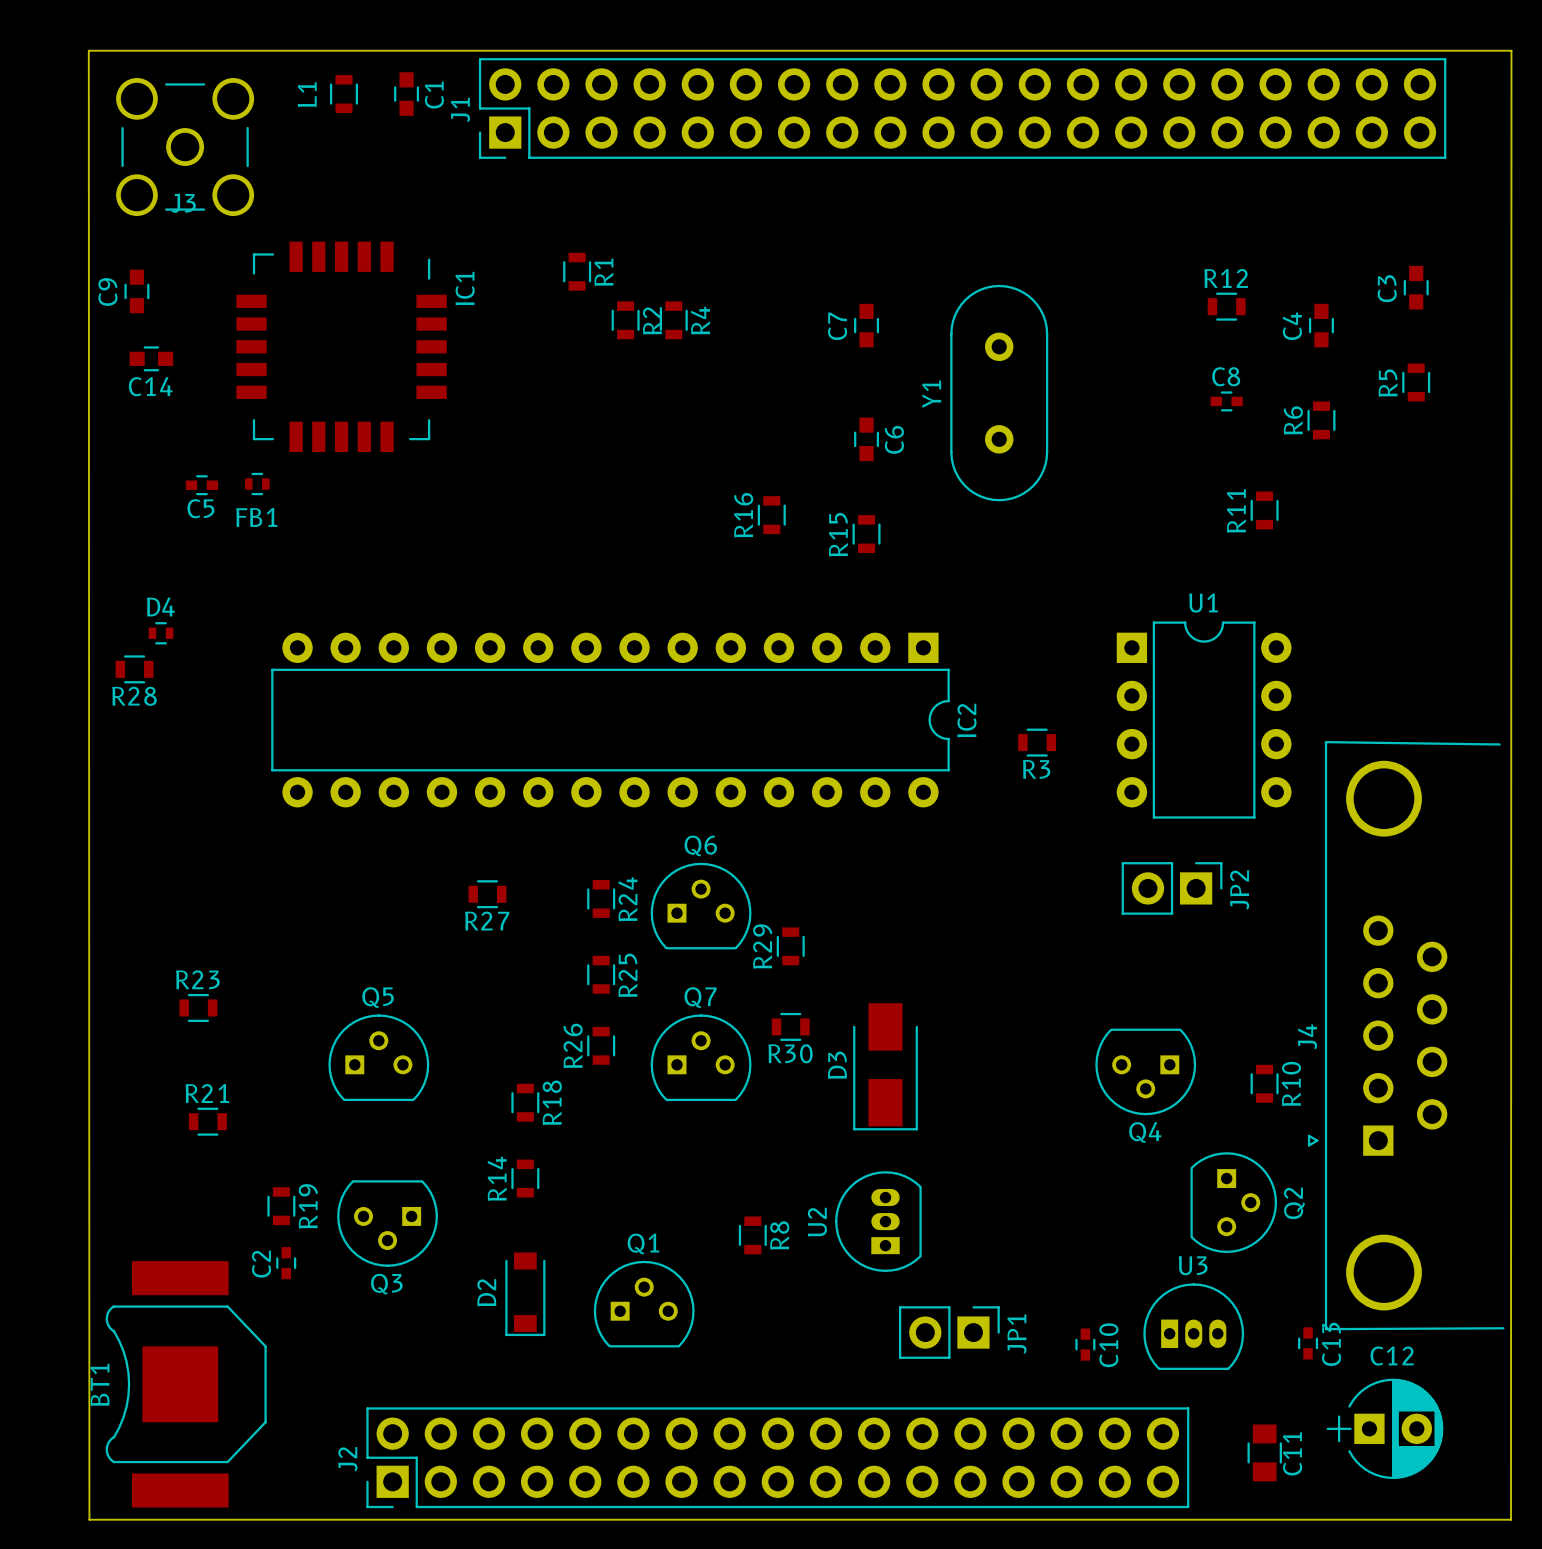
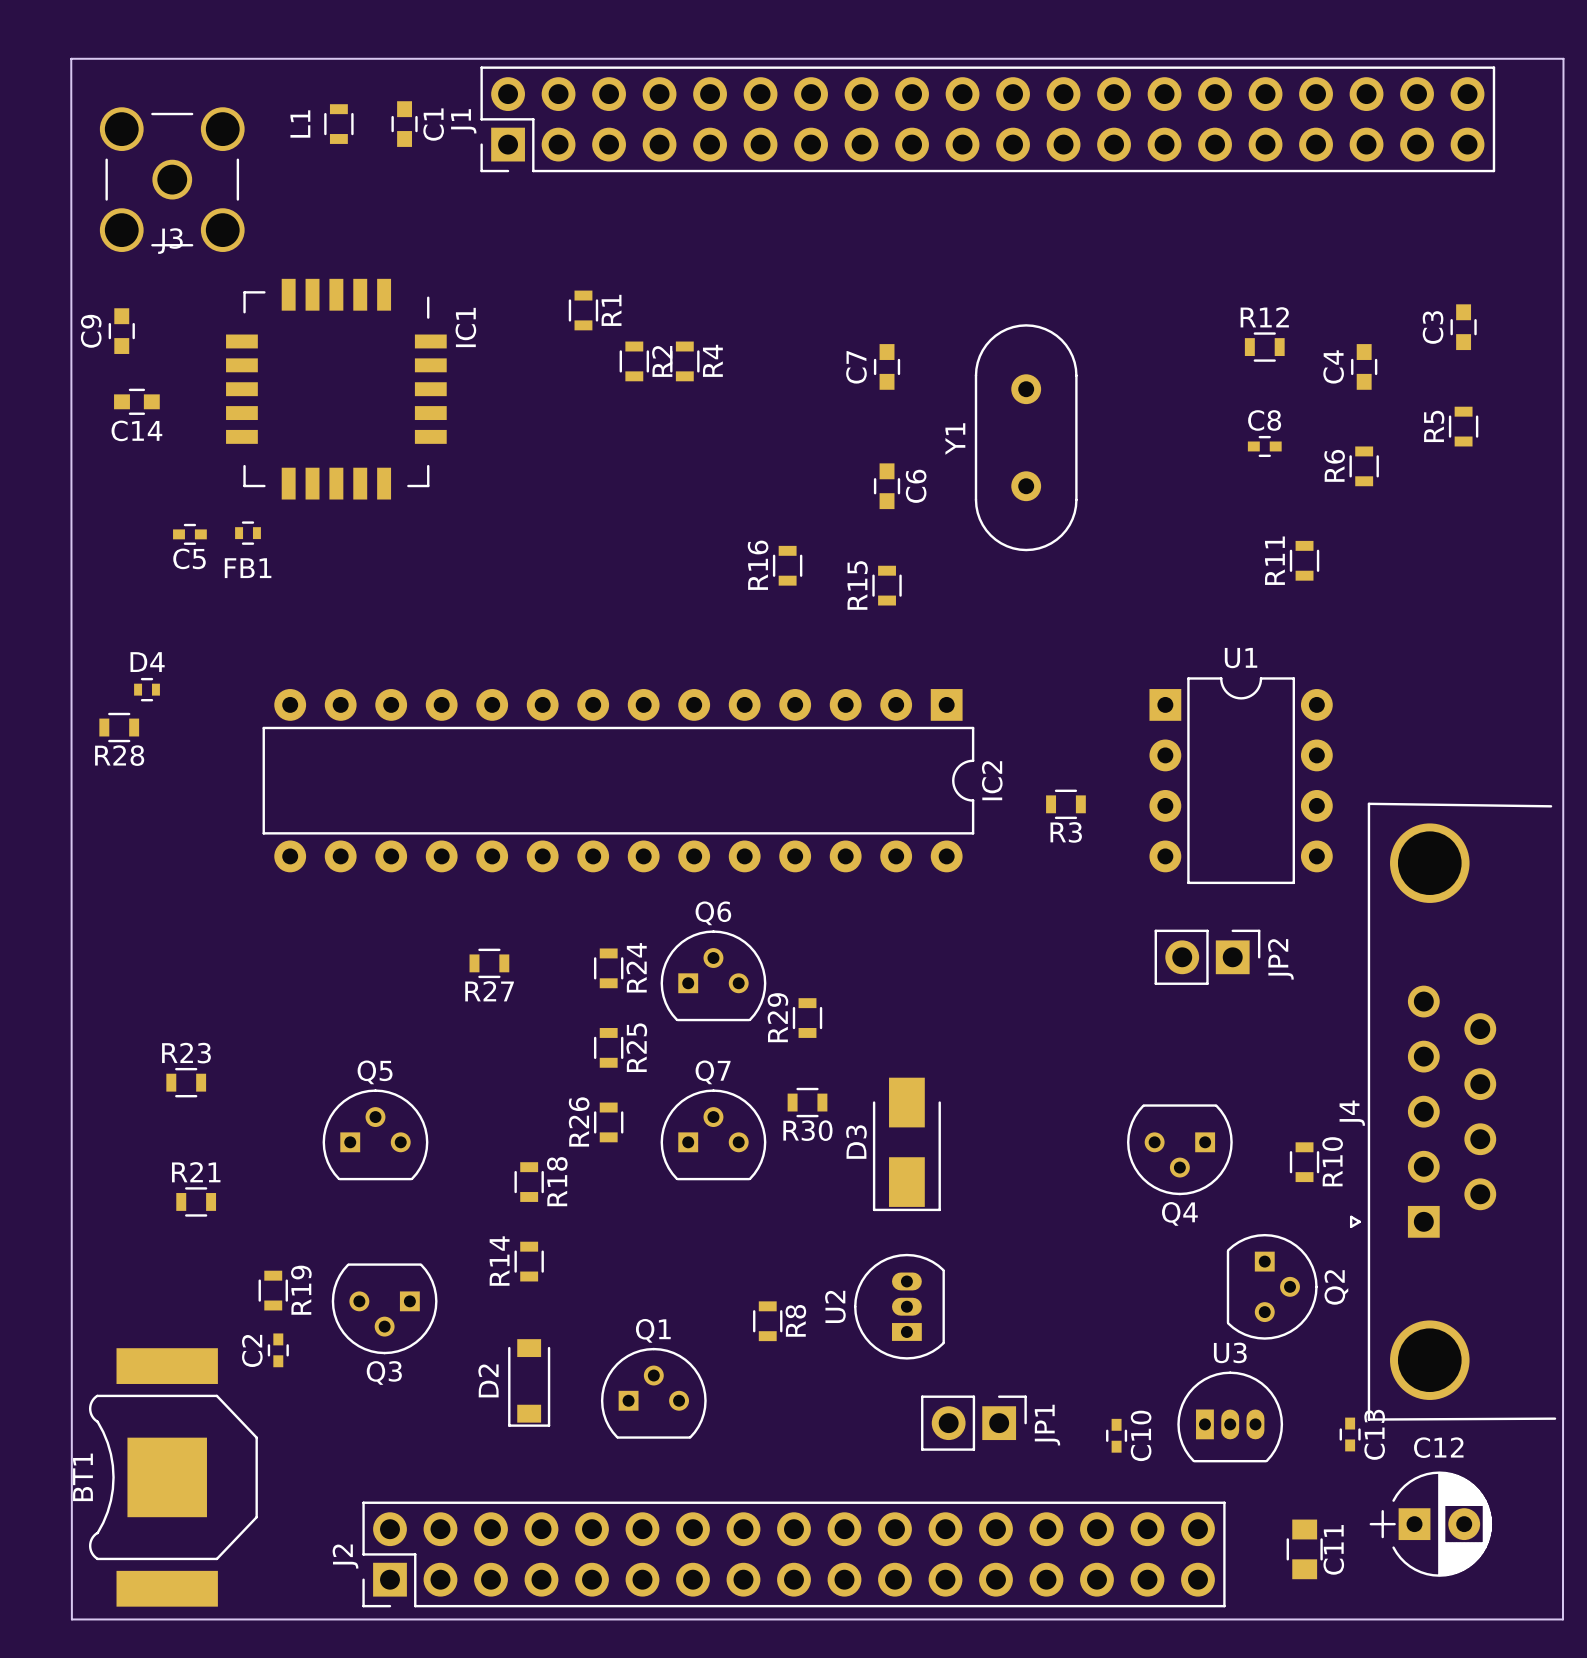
board edge: (88, 50) (1511, 50) -> (71, 78) (71, 58) (1563, 58) (1563, 78)
J1 position: (962, 108) -> (987, 119)

